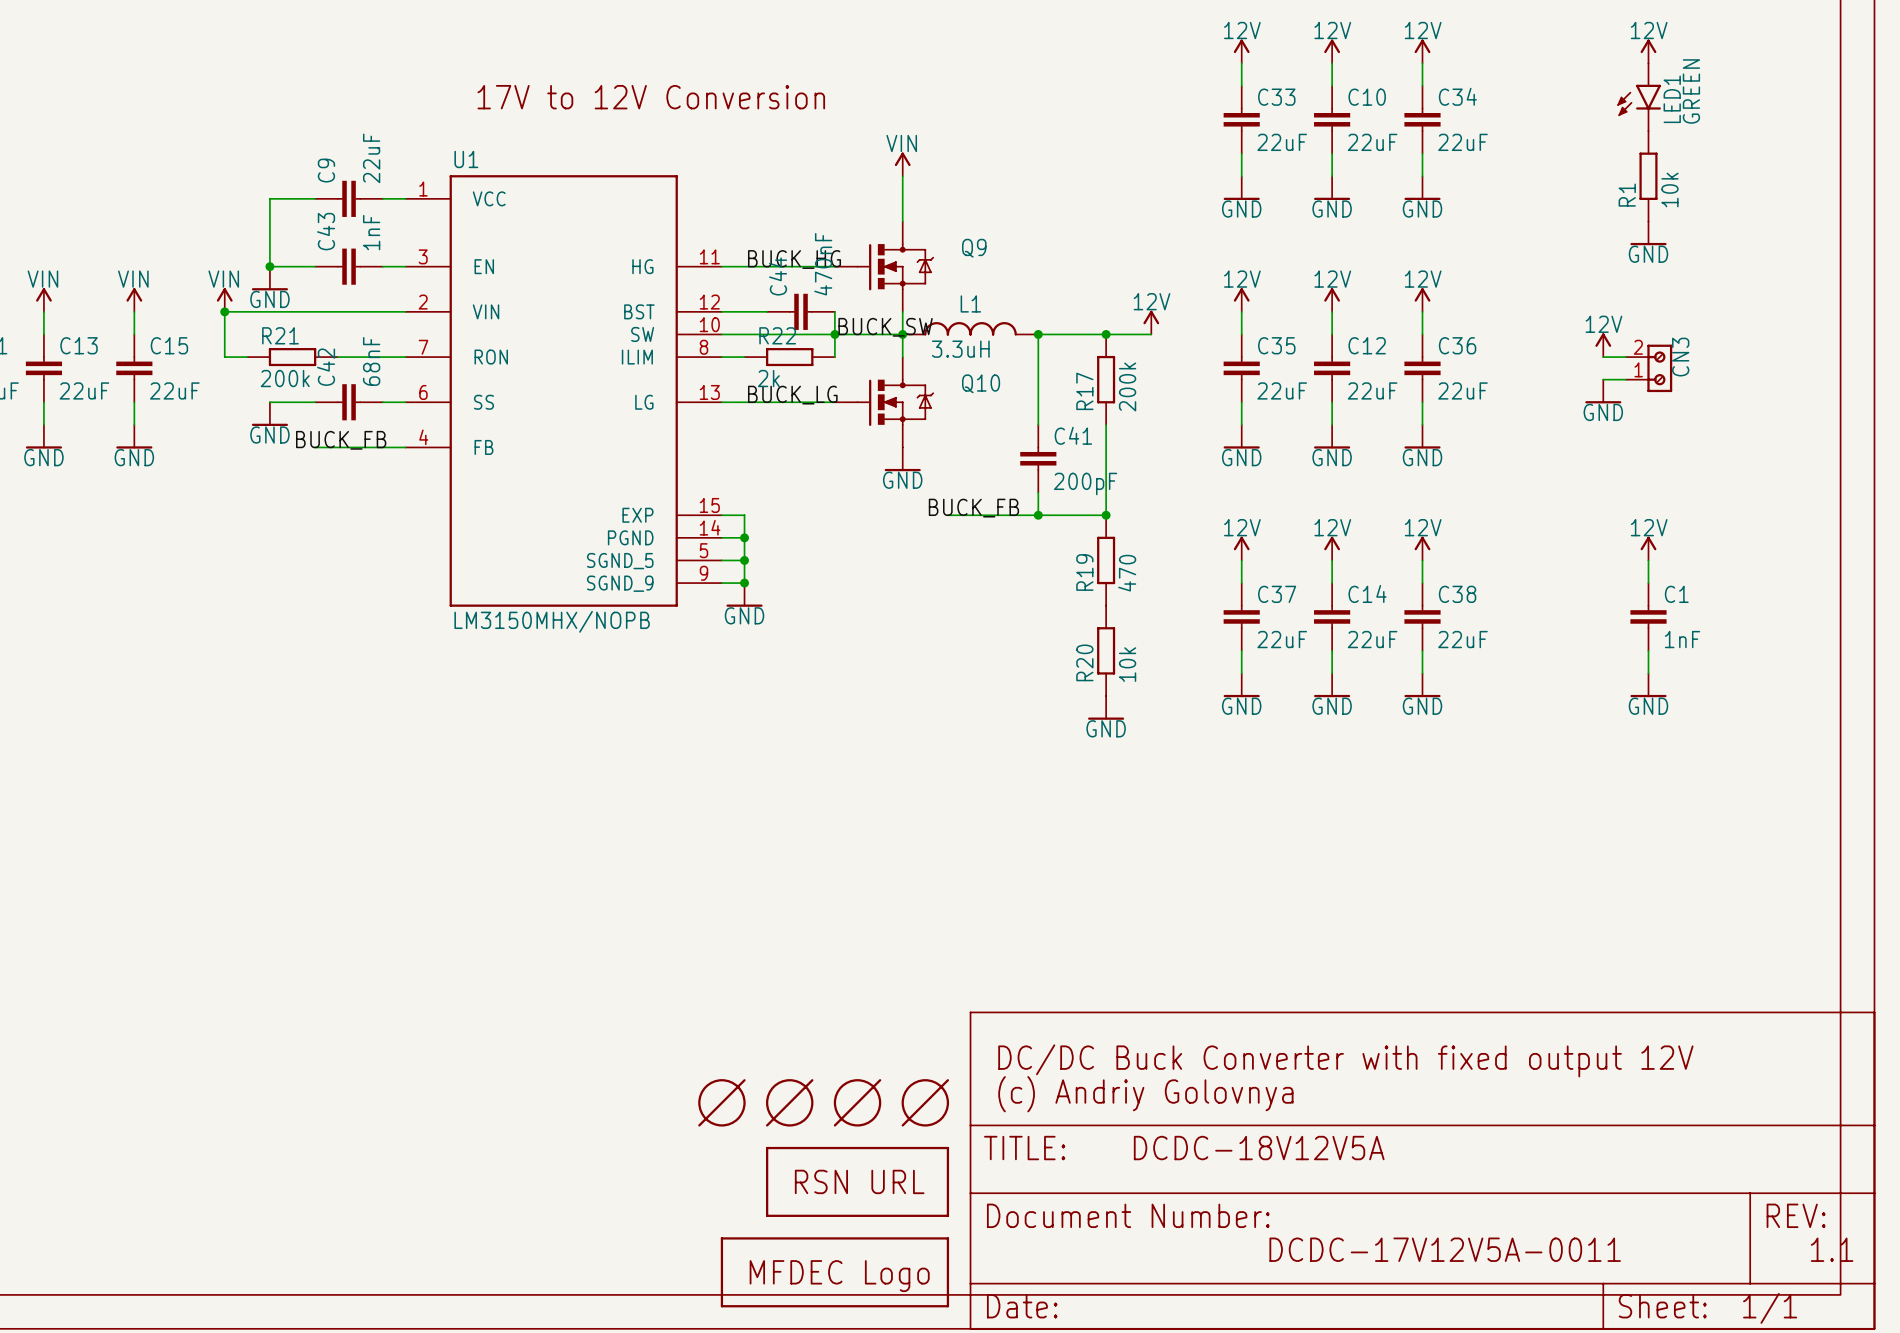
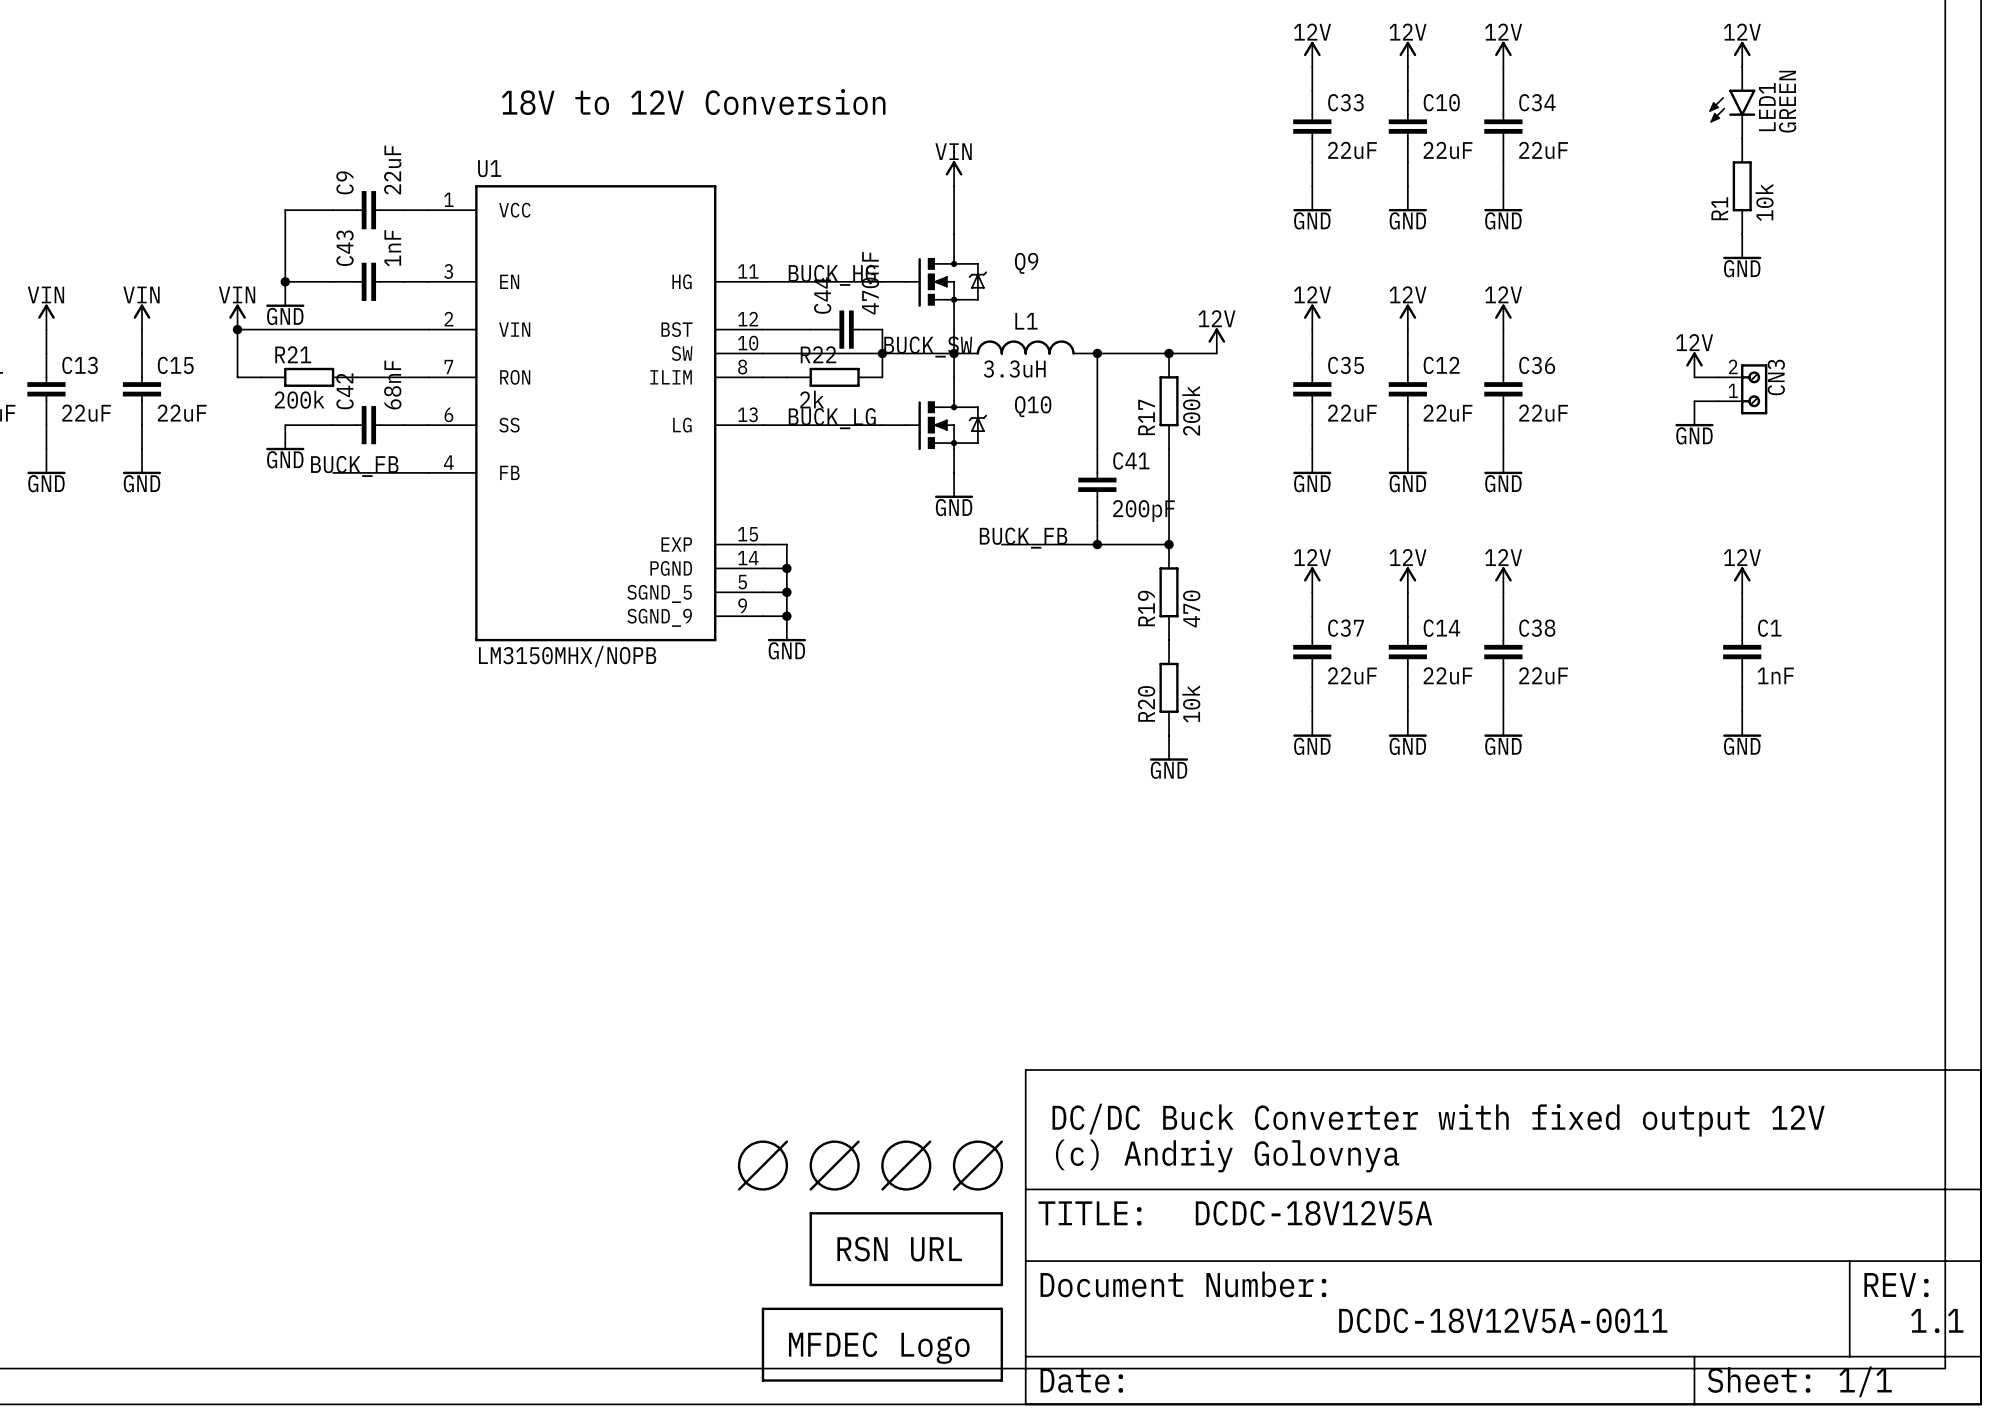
text: 17V to 12V Conversion (651, 97) -> 18V to 12V Conversion (693, 102)
text: DCDC-17V12V5A-0011 (1445, 1249) -> DCDC-18V12V5A-0011 (1503, 1320)

